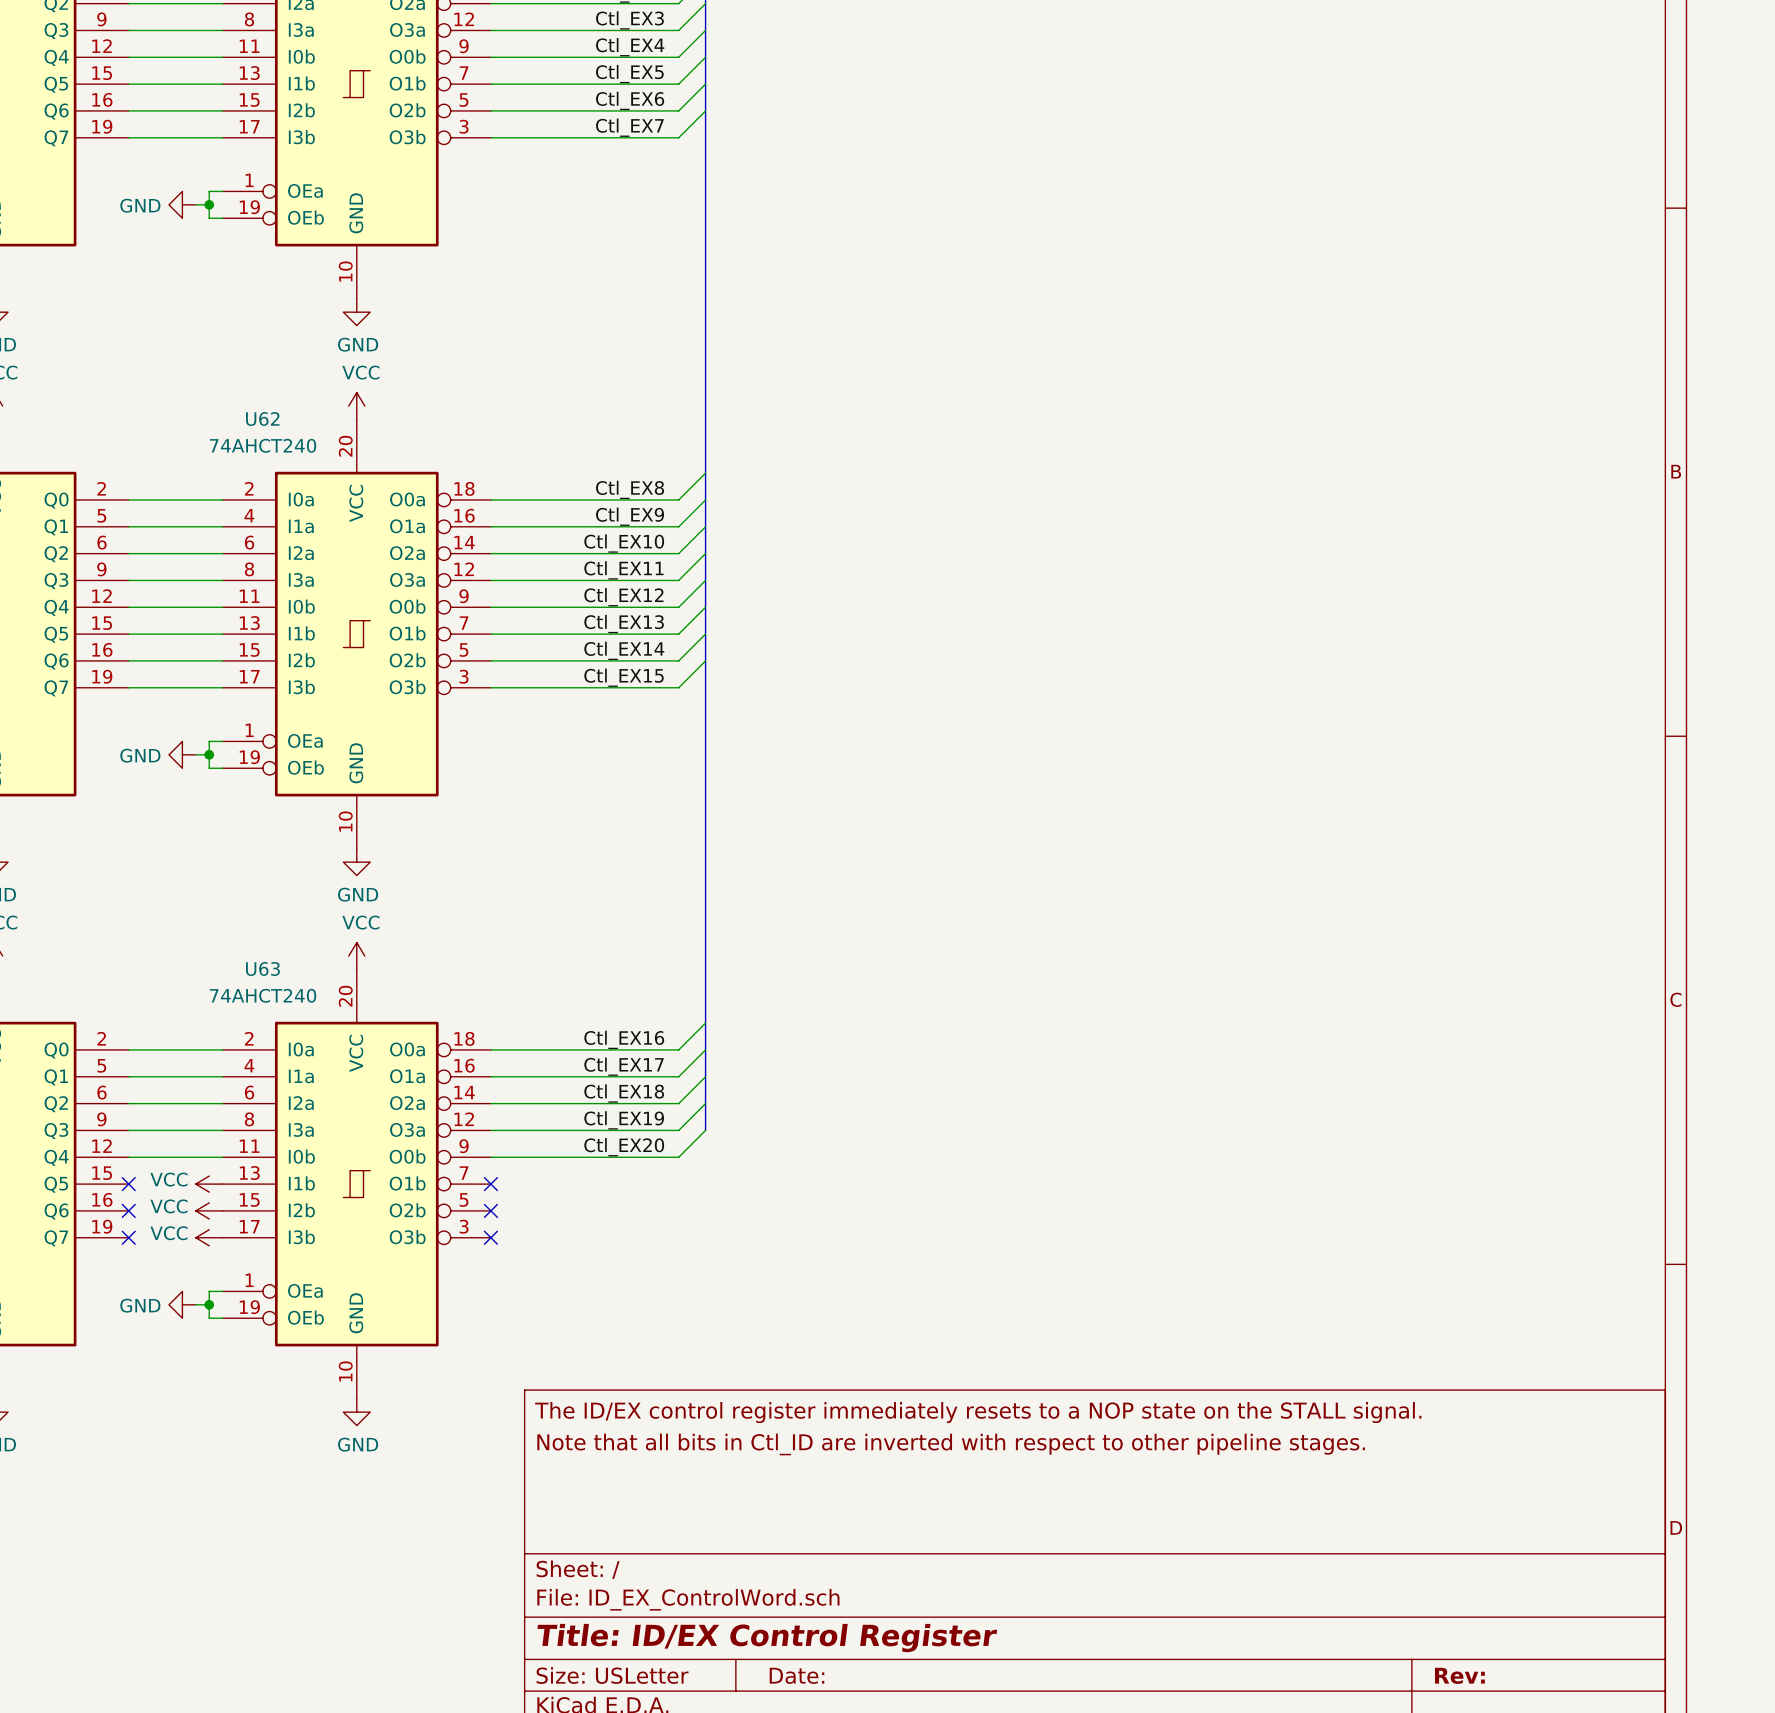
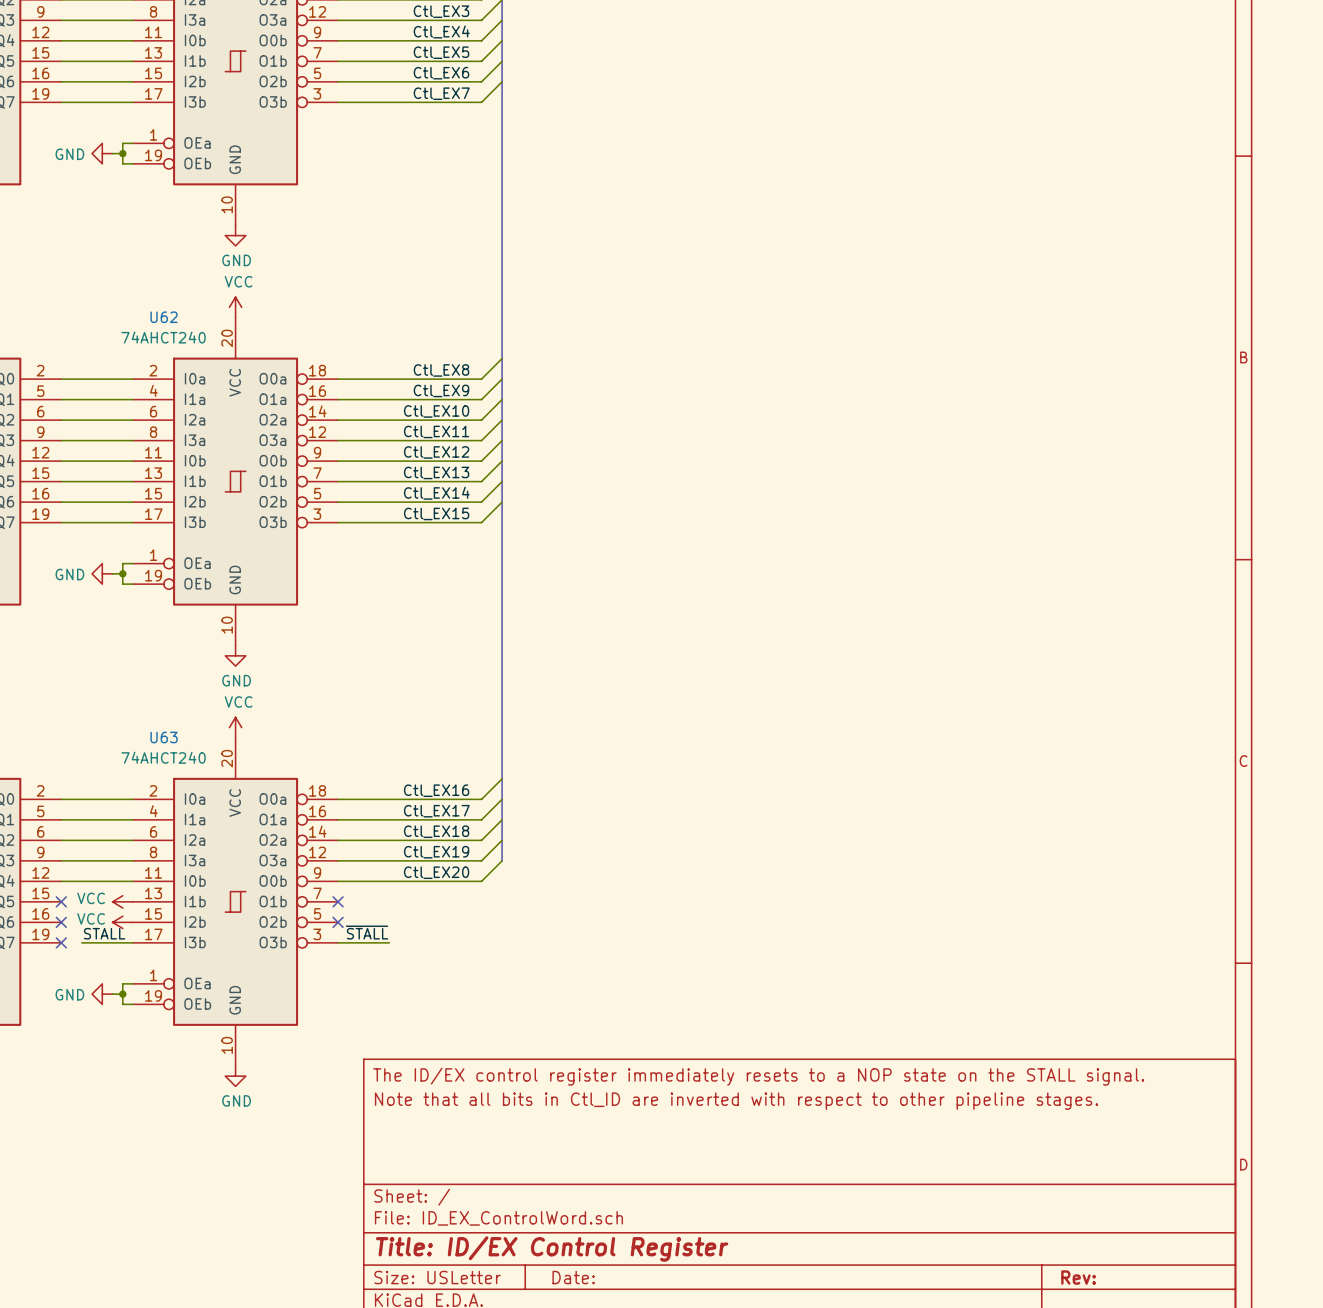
label: none -> ~{STALL} (367, 932)
label: none -> STALL (104, 933)
power symbol: VCC (209, 1237) -> none
wire: none -> (338, 942) (389, 942)
no-connect mark: (490, 1237) -> none

